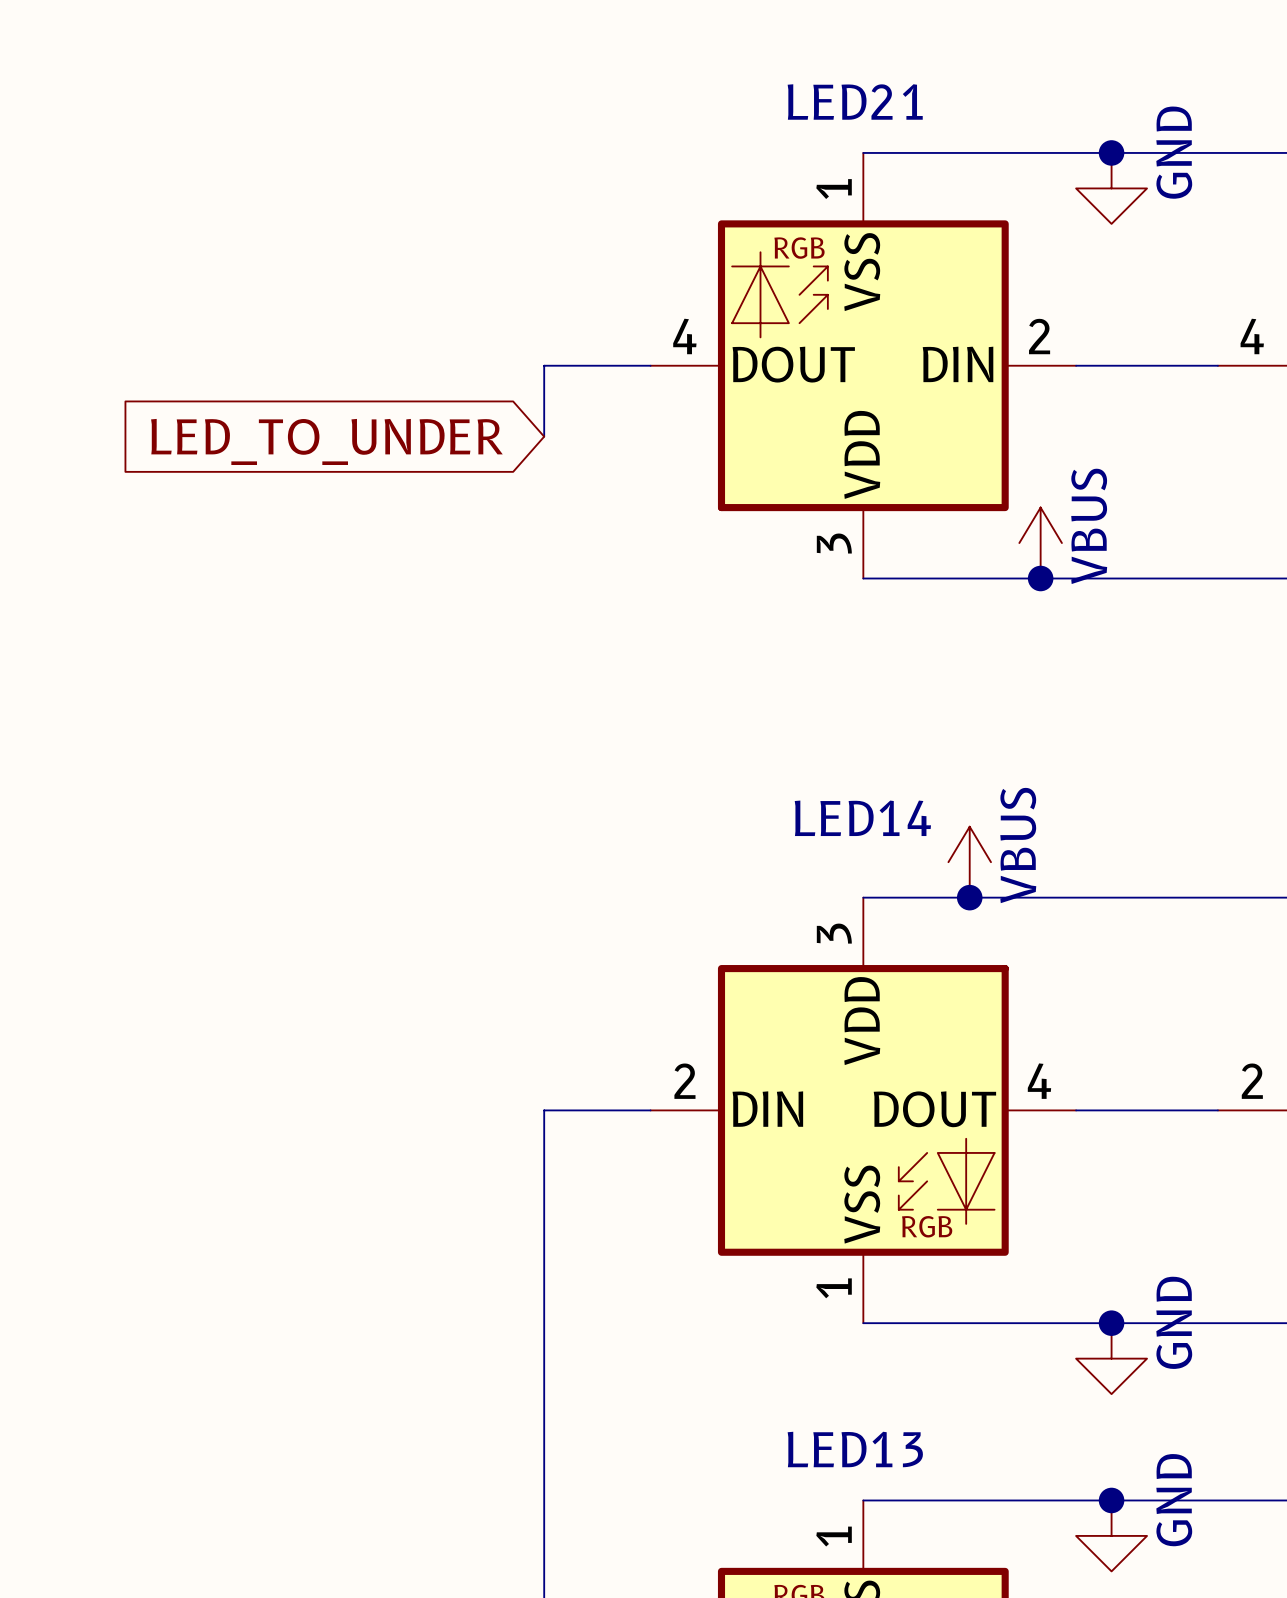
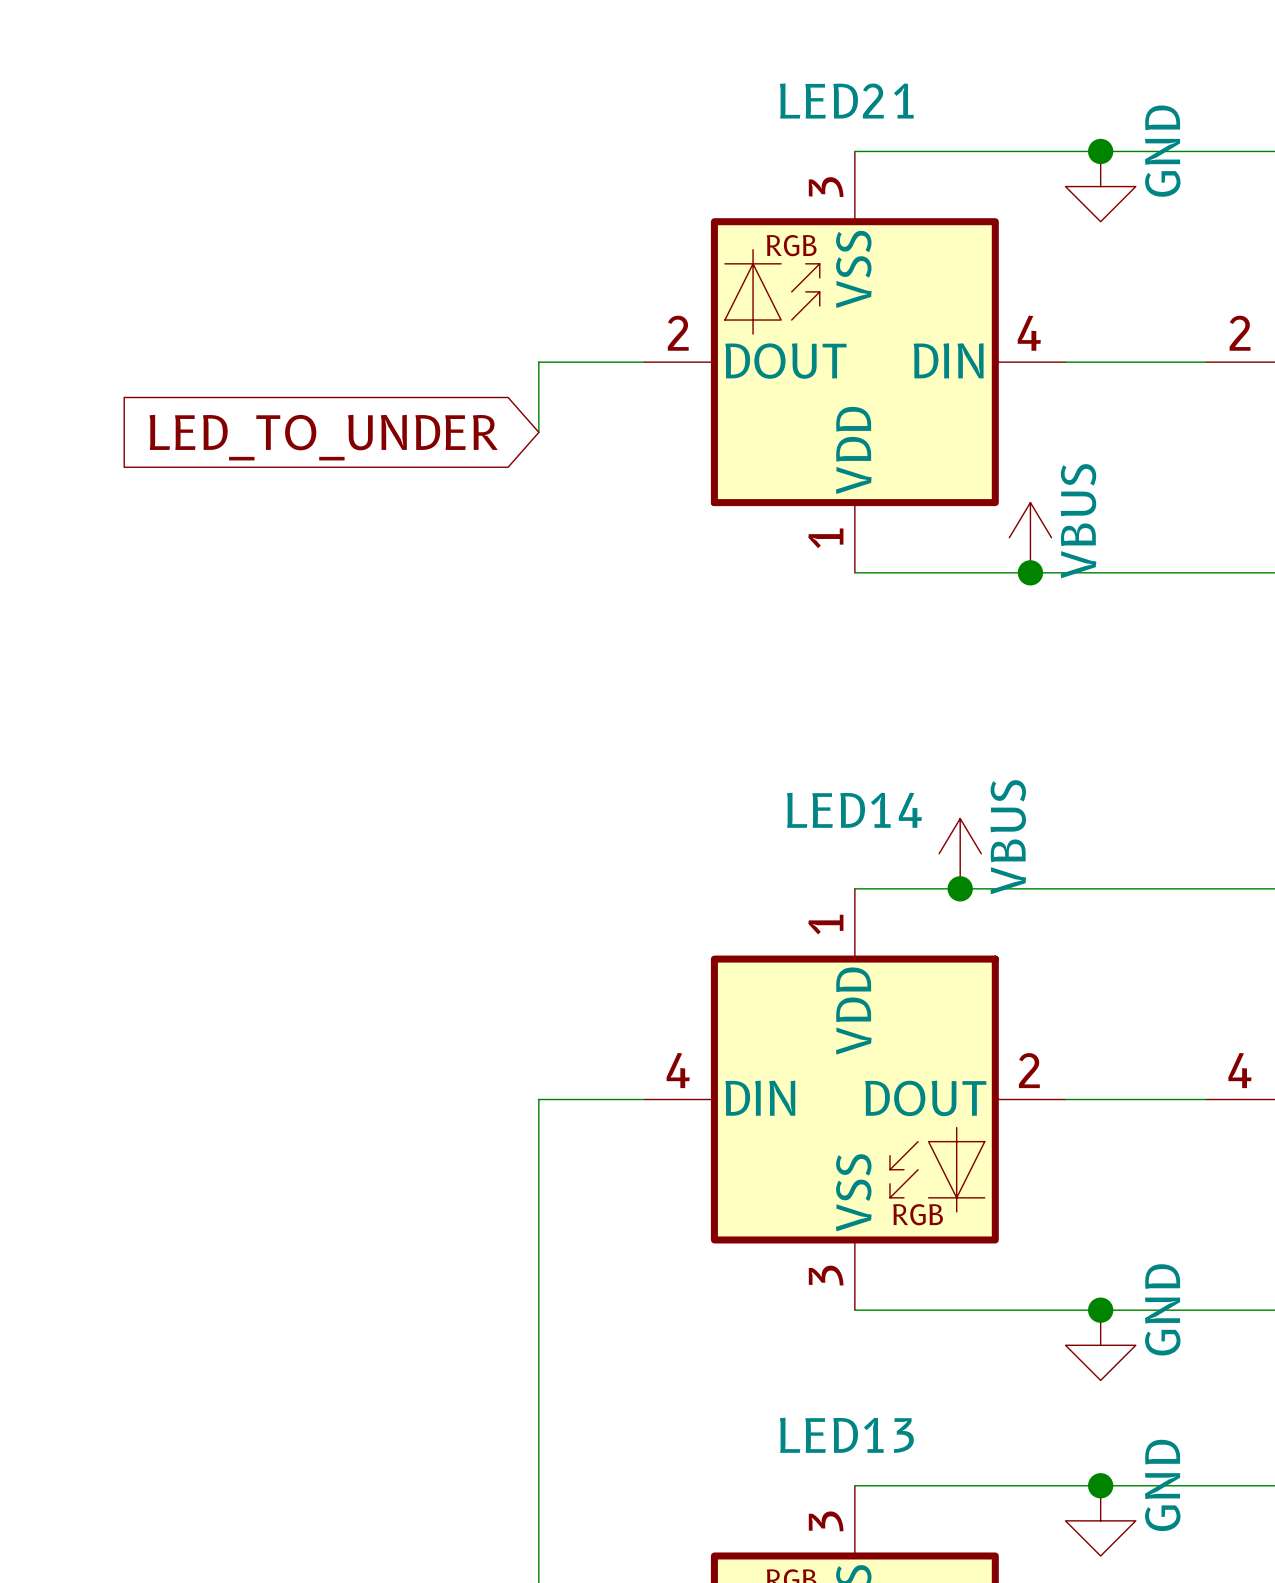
LED21 pin number: 1 (834, 189) -> 3 (826, 187)
LED21 pin number: 4 (684, 336) -> 2 (678, 333)
LED21 pin number: 2 (1039, 336) -> 4 (1029, 333)
part pin number: 4 (1252, 336) -> 2 (1240, 333)
LED21 pin number: 3 (834, 543) -> 1 (825, 538)
LED14 pin number: 3 (834, 933) -> 1 (825, 924)
LED14 pin number: 2 (684, 1081) -> 4 (678, 1070)
LED14 pin number: 4 (1039, 1081) -> 2 (1029, 1070)
part pin number: 2 (1252, 1081) -> 4 (1239, 1070)
LED14 pin number: 1 (834, 1288) -> 3 (826, 1275)
LED13 pin number: 1 (834, 1536) -> 3 (826, 1521)

